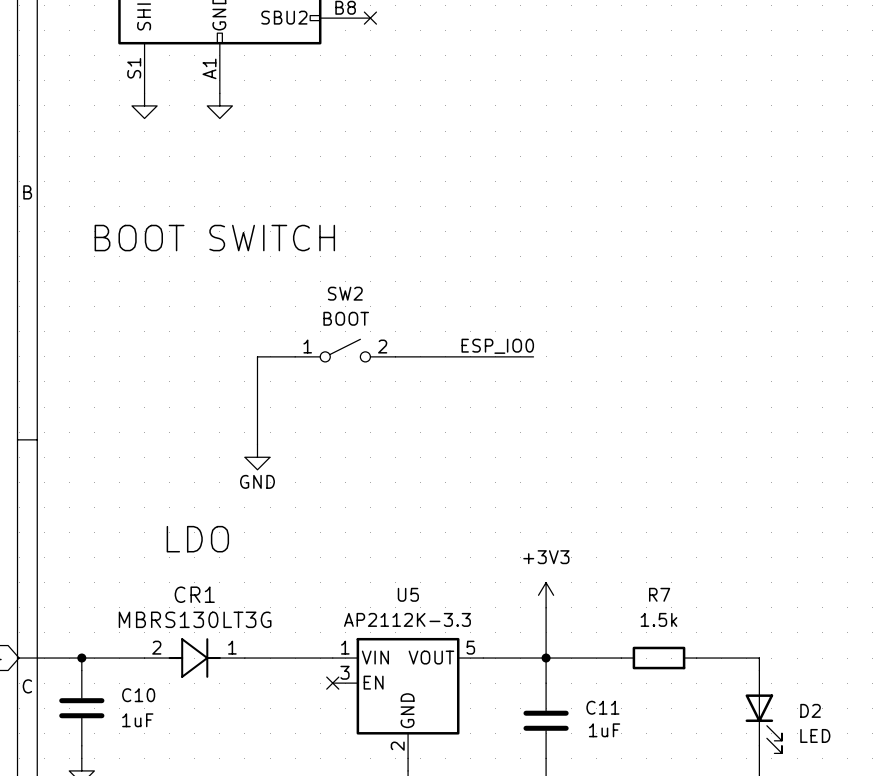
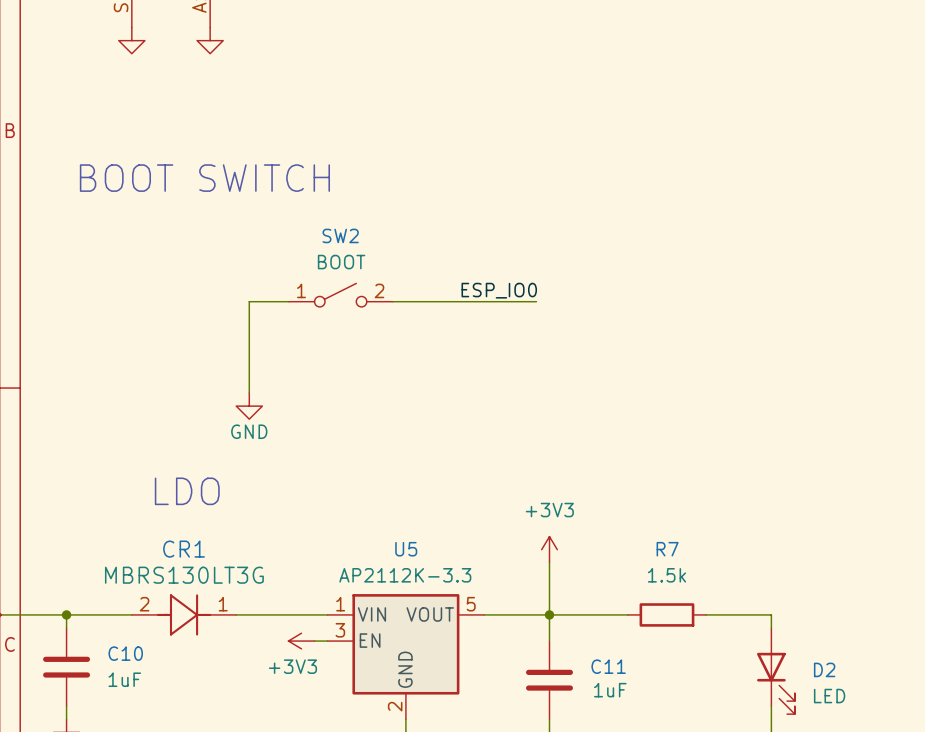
power symbol: none -> +3V3 (301, 641)
wire: none -> (314, 641) (327, 641)
no-connect mark: (332, 683) -> none

